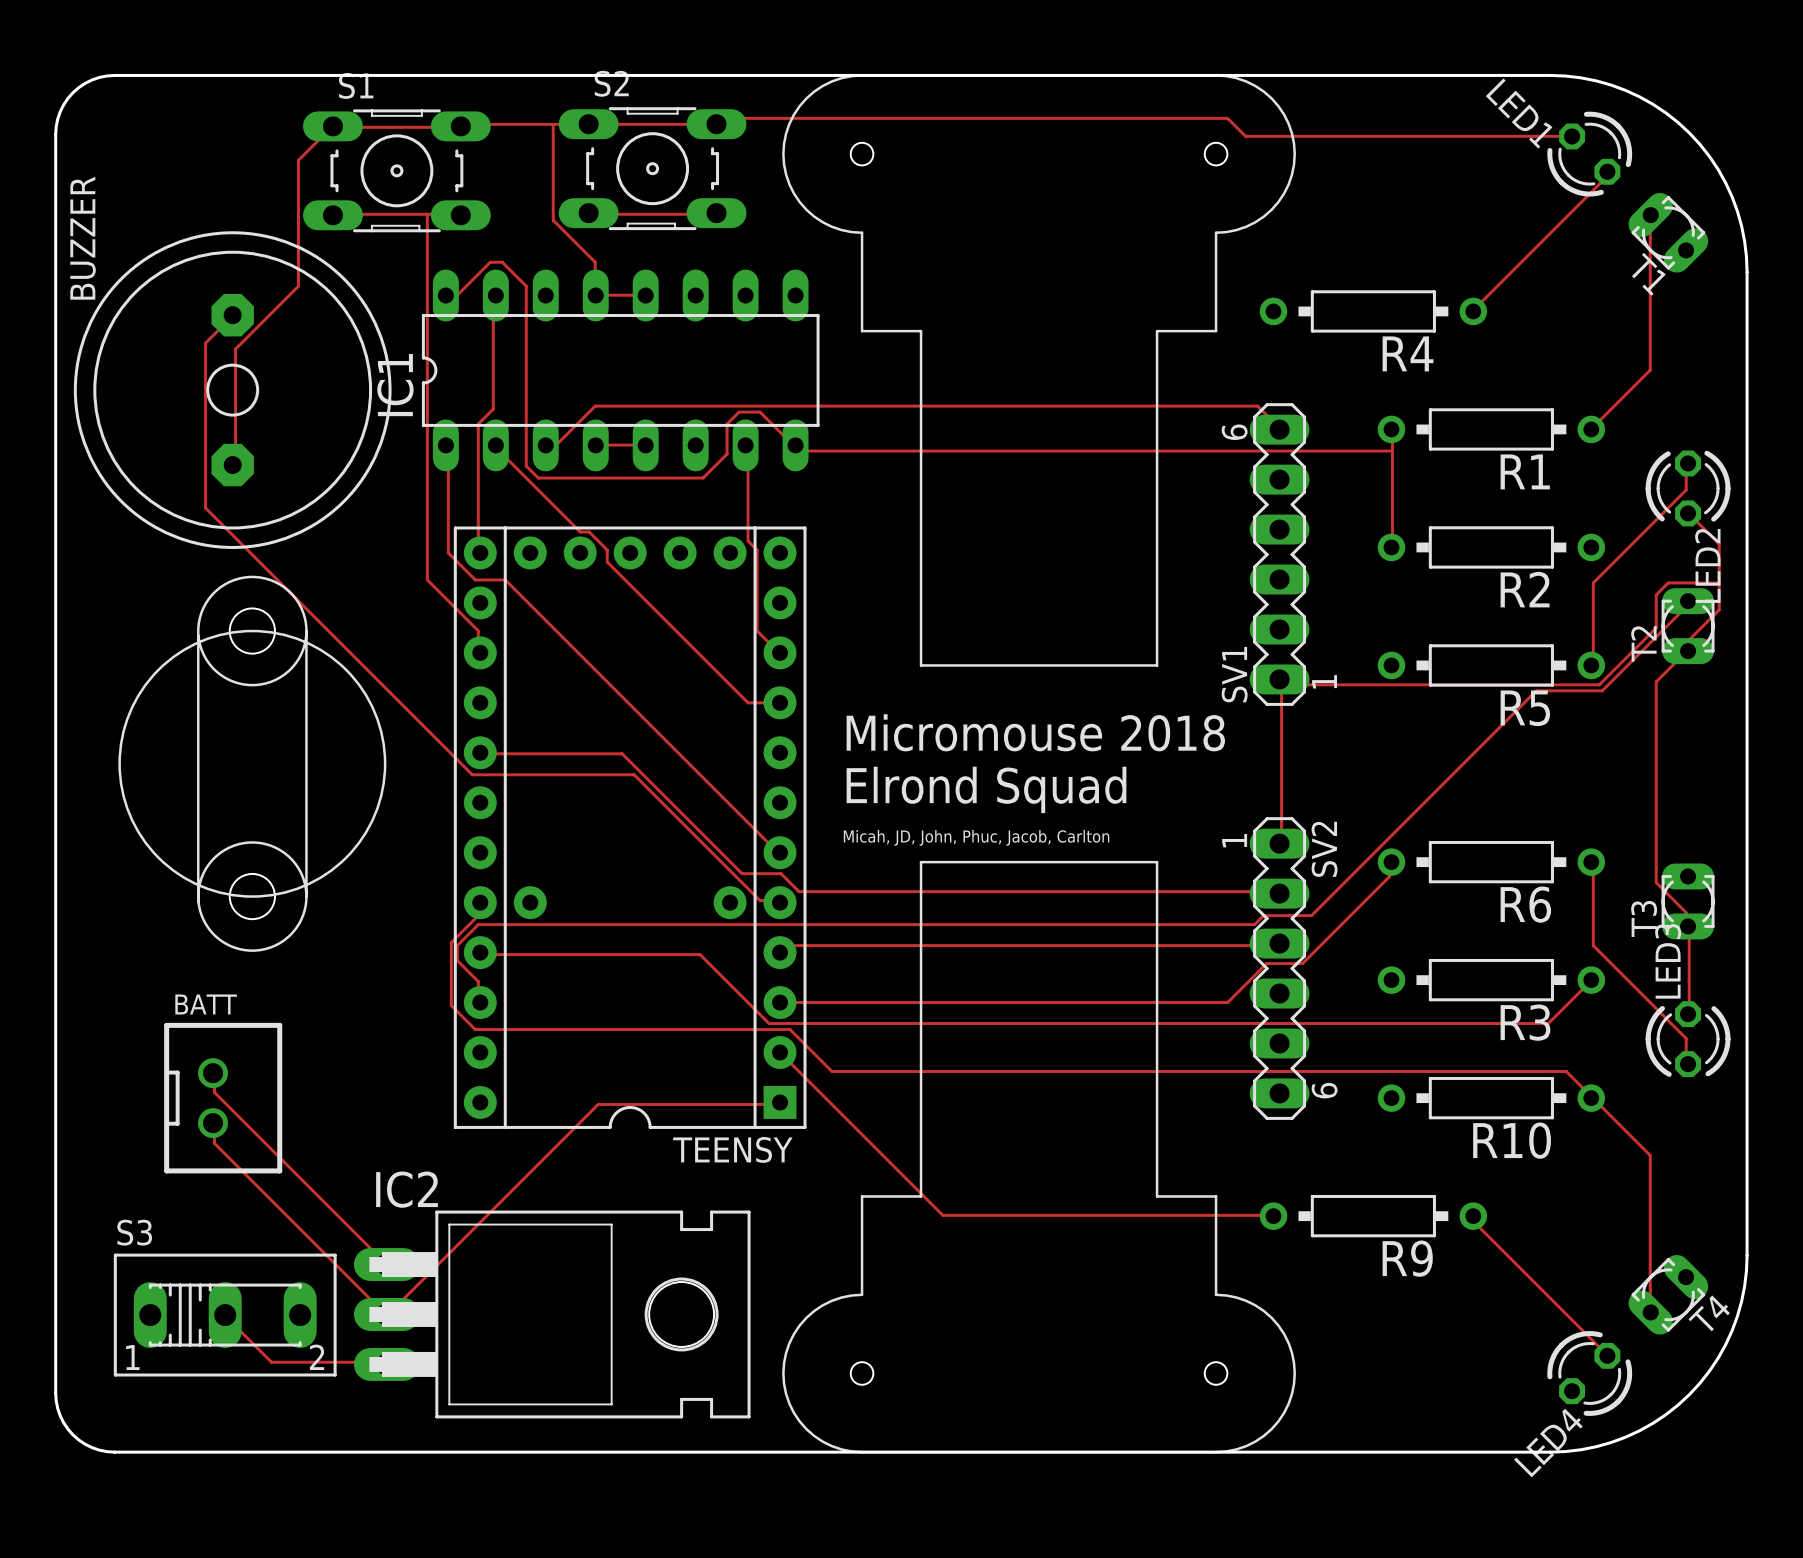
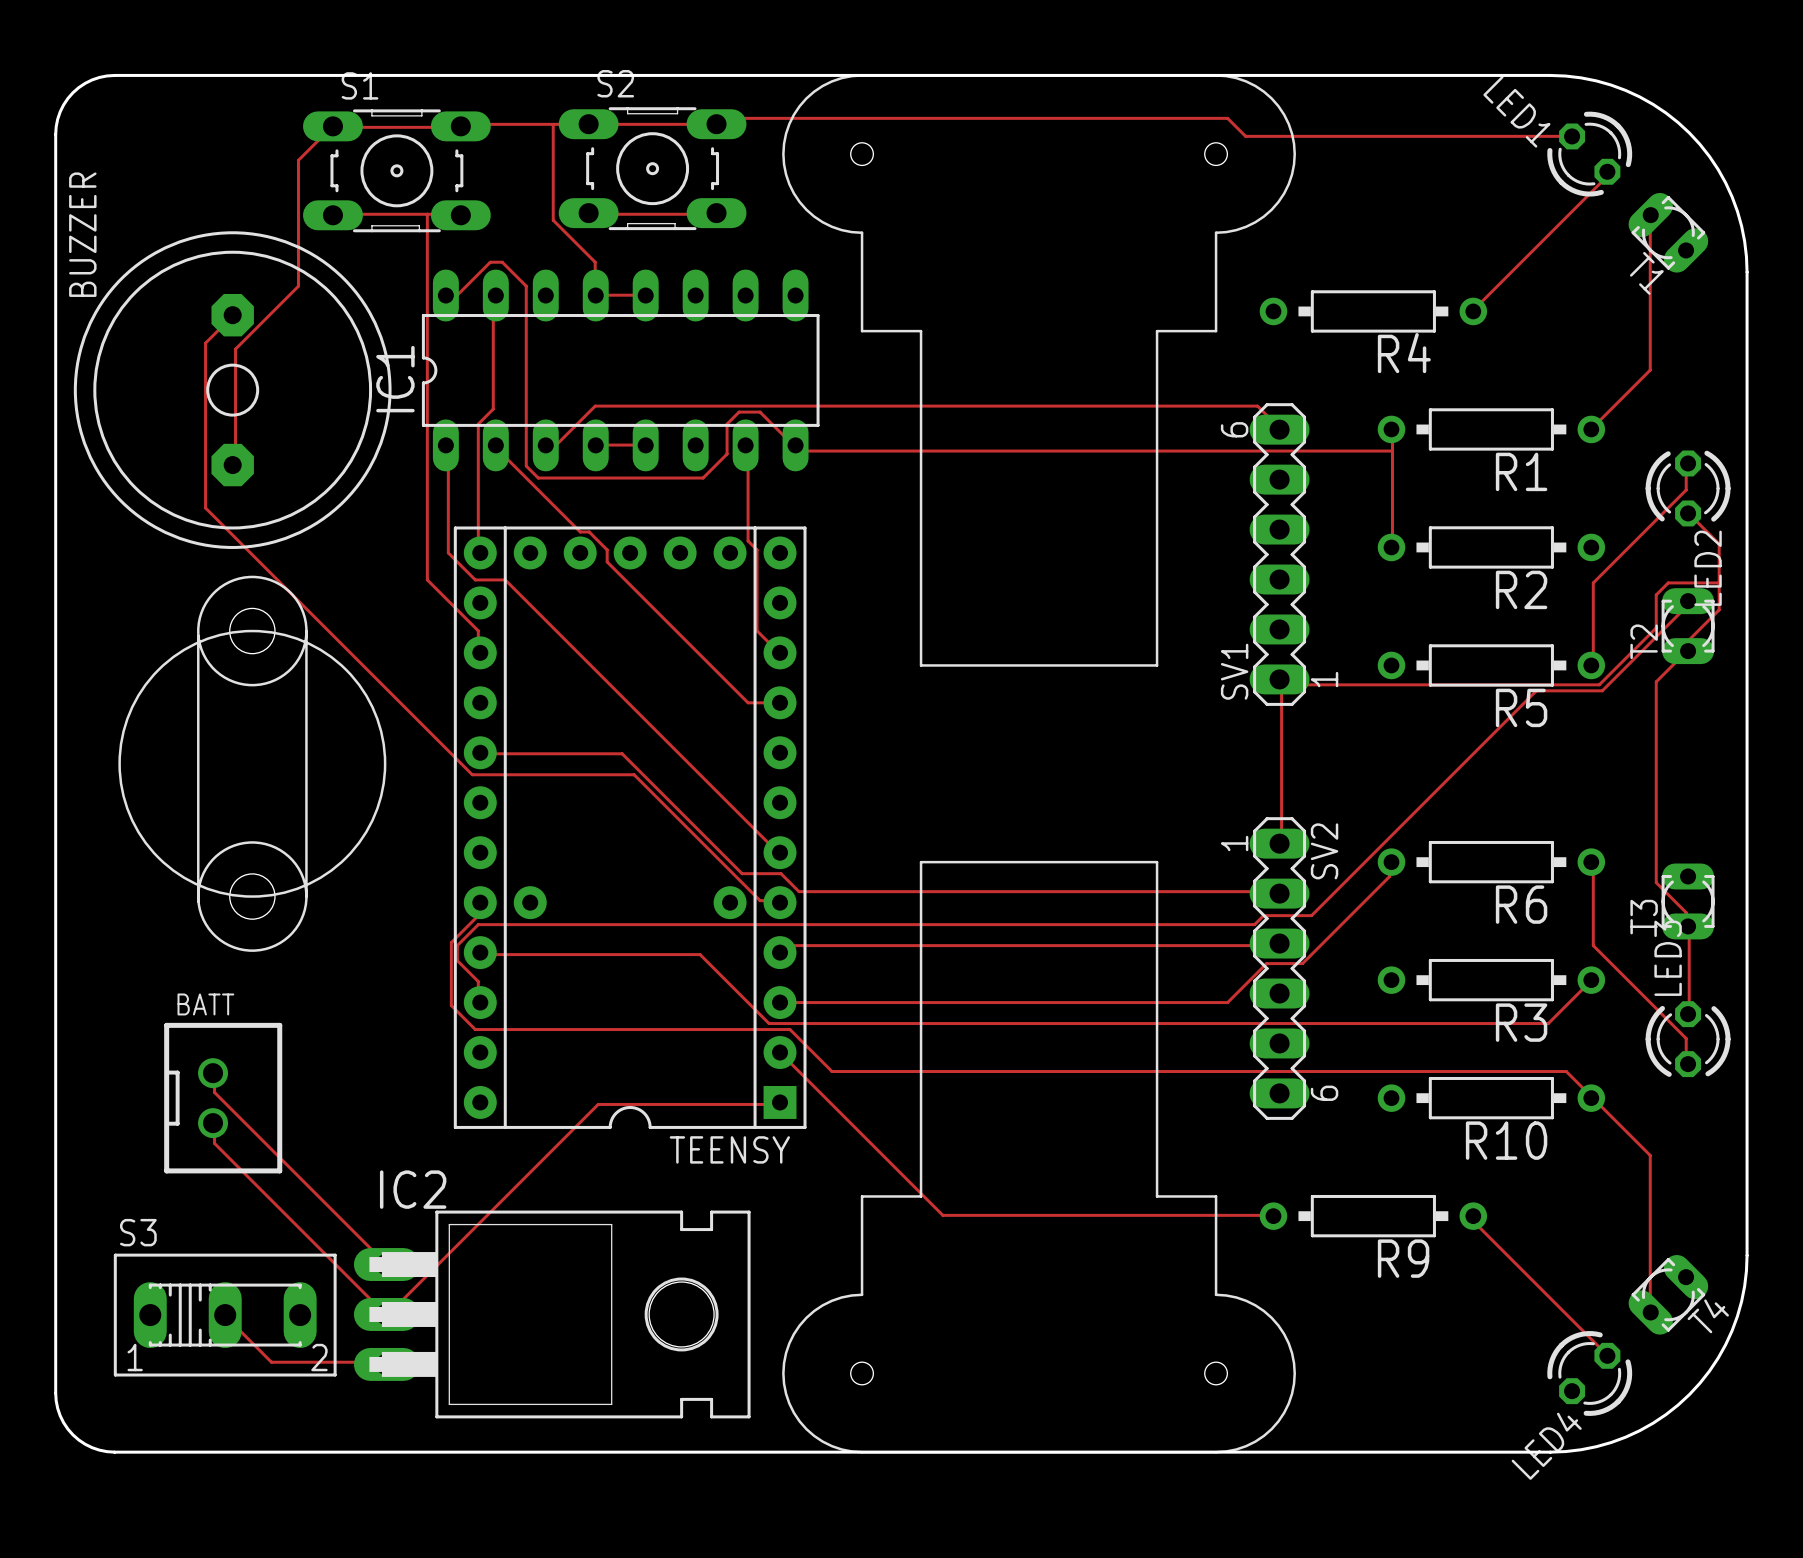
text: Micromouse 2018 (1035, 732) -> none
text: Elrond Squad (986, 789) -> none
text: Micah, JD, John, Phuc, Jacob, Carlton (976, 837) -> none

